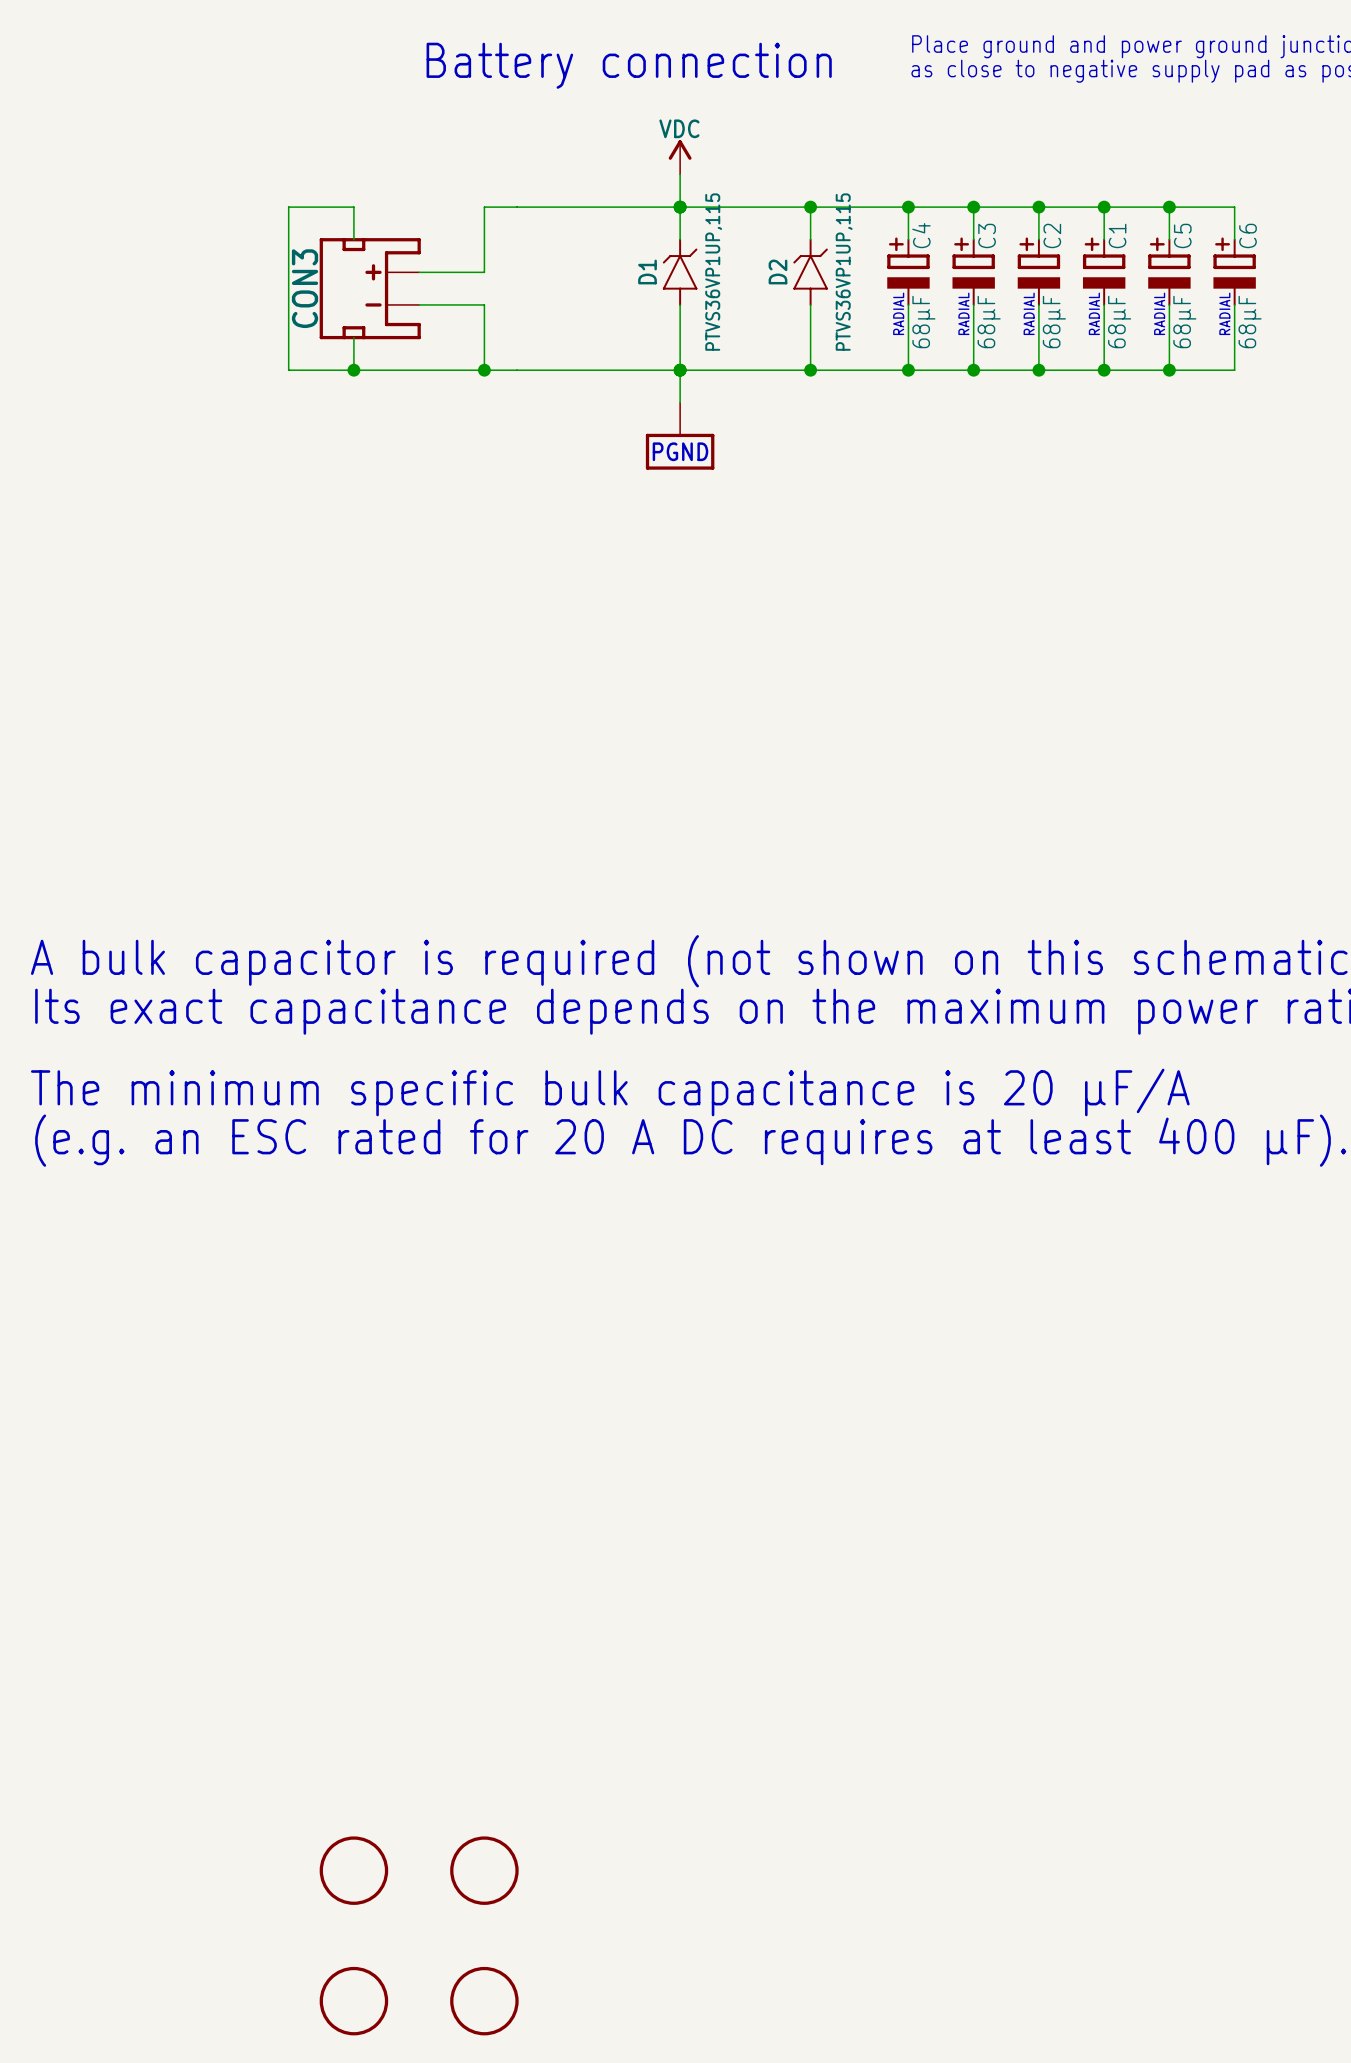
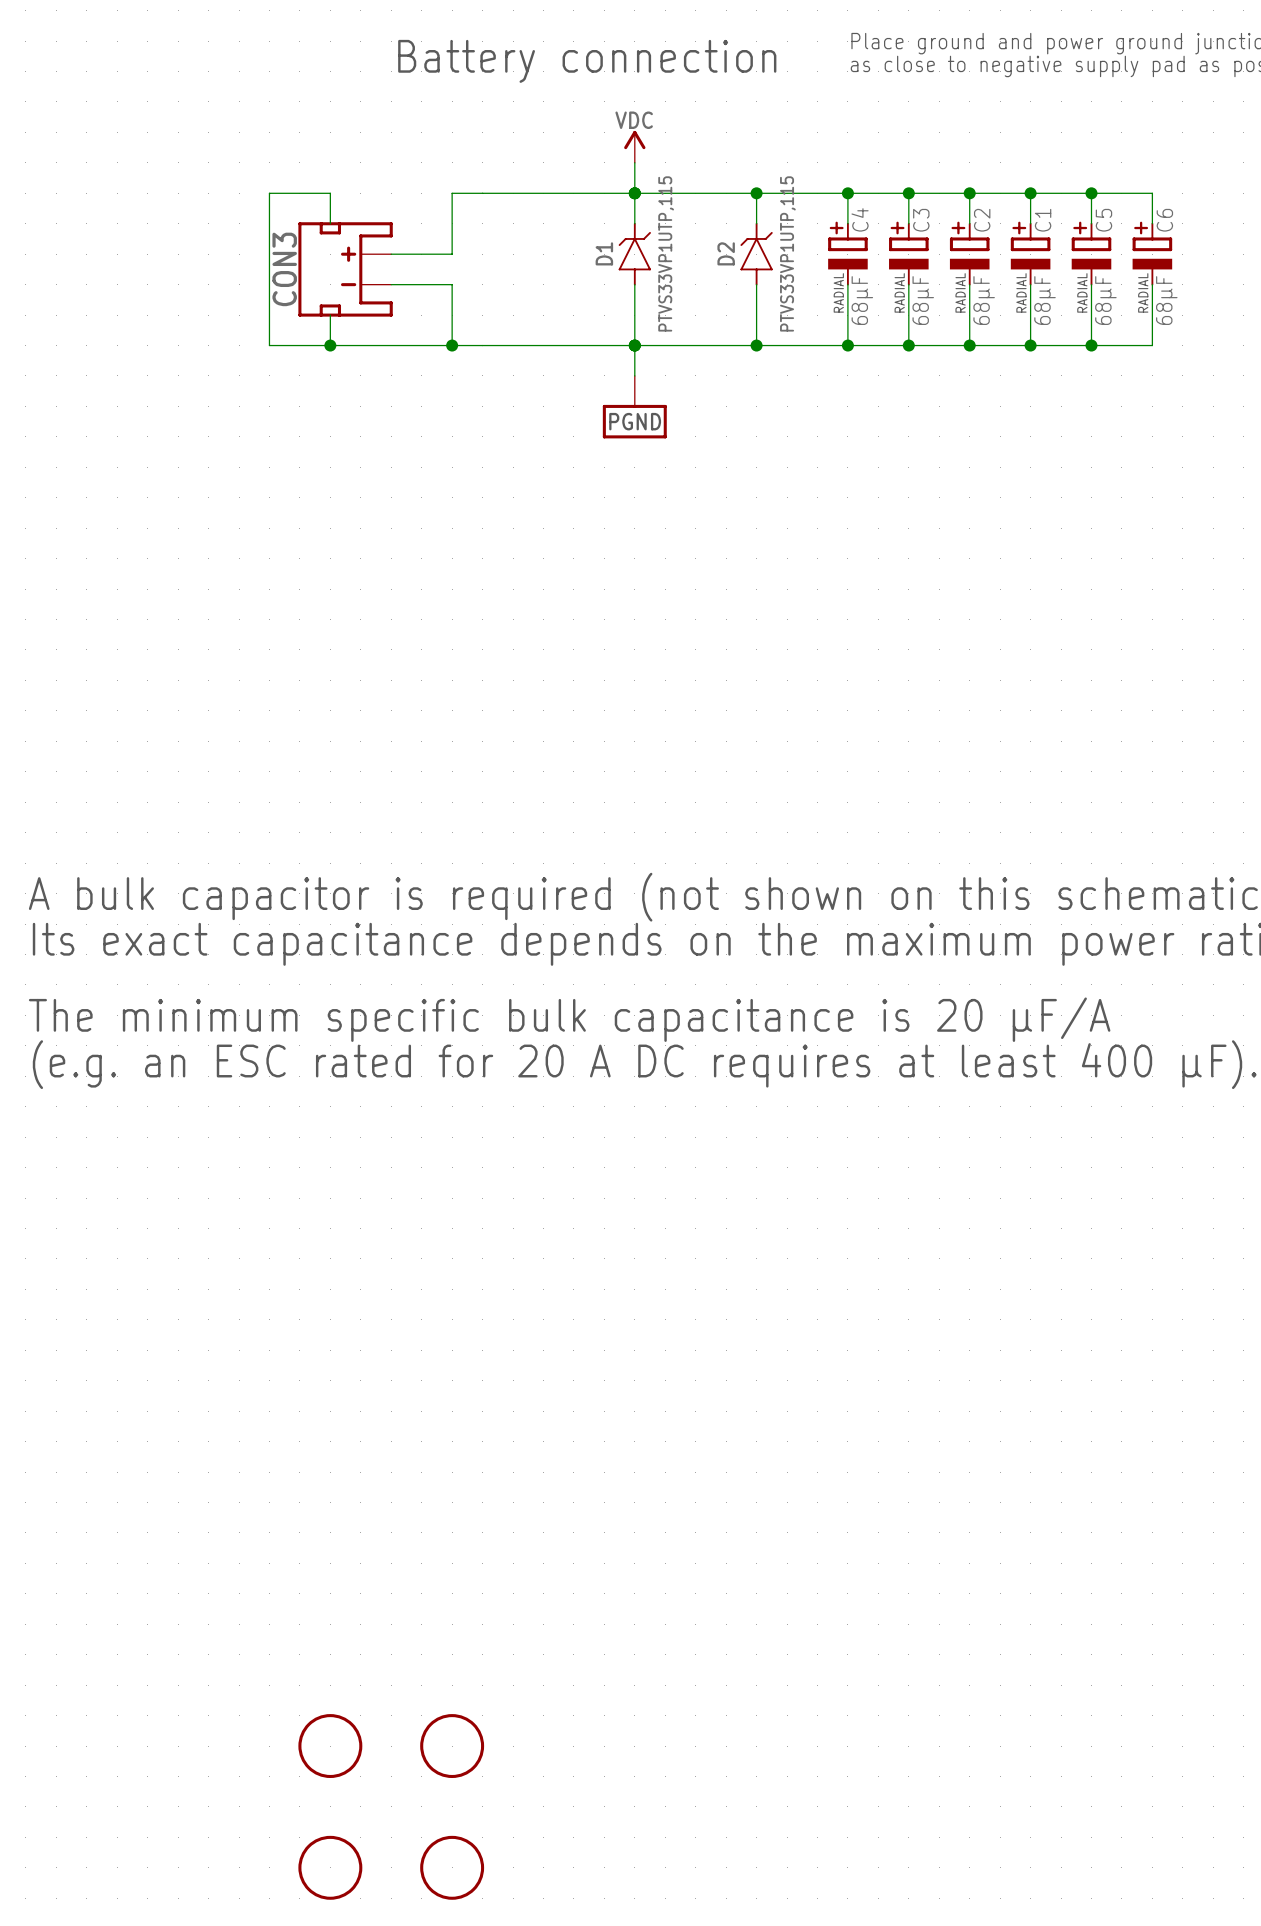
D1 text: PTVS36VP1UP,115 (713, 272) -> PTVS33VP1UTP,115 (666, 253)
D2 text: PTVS36VP1UP,115 (844, 272) -> PTVS33VP1UTP,115 (787, 253)

